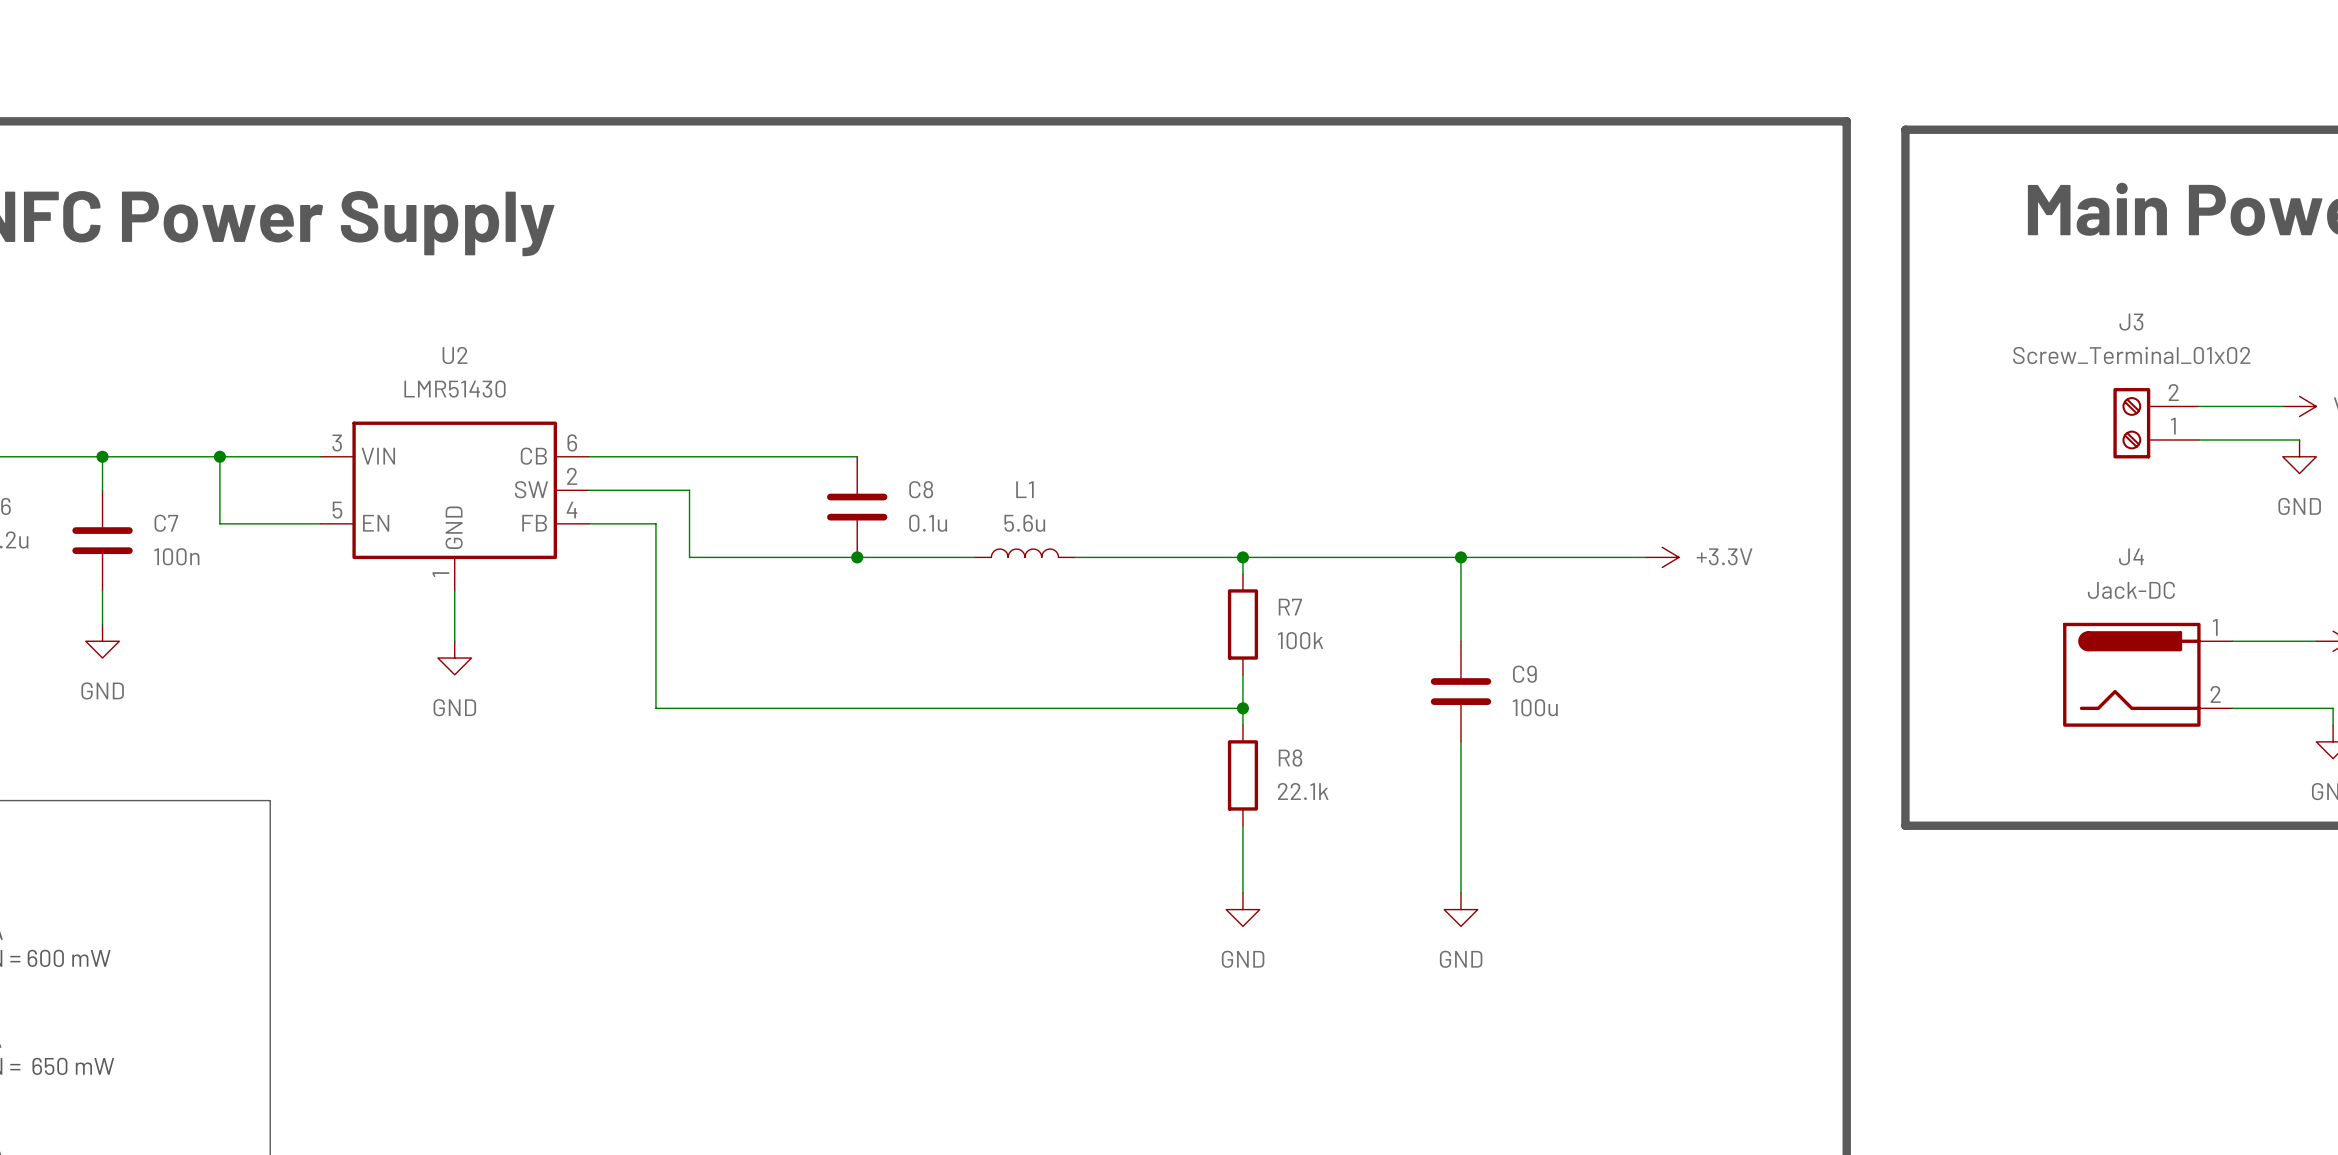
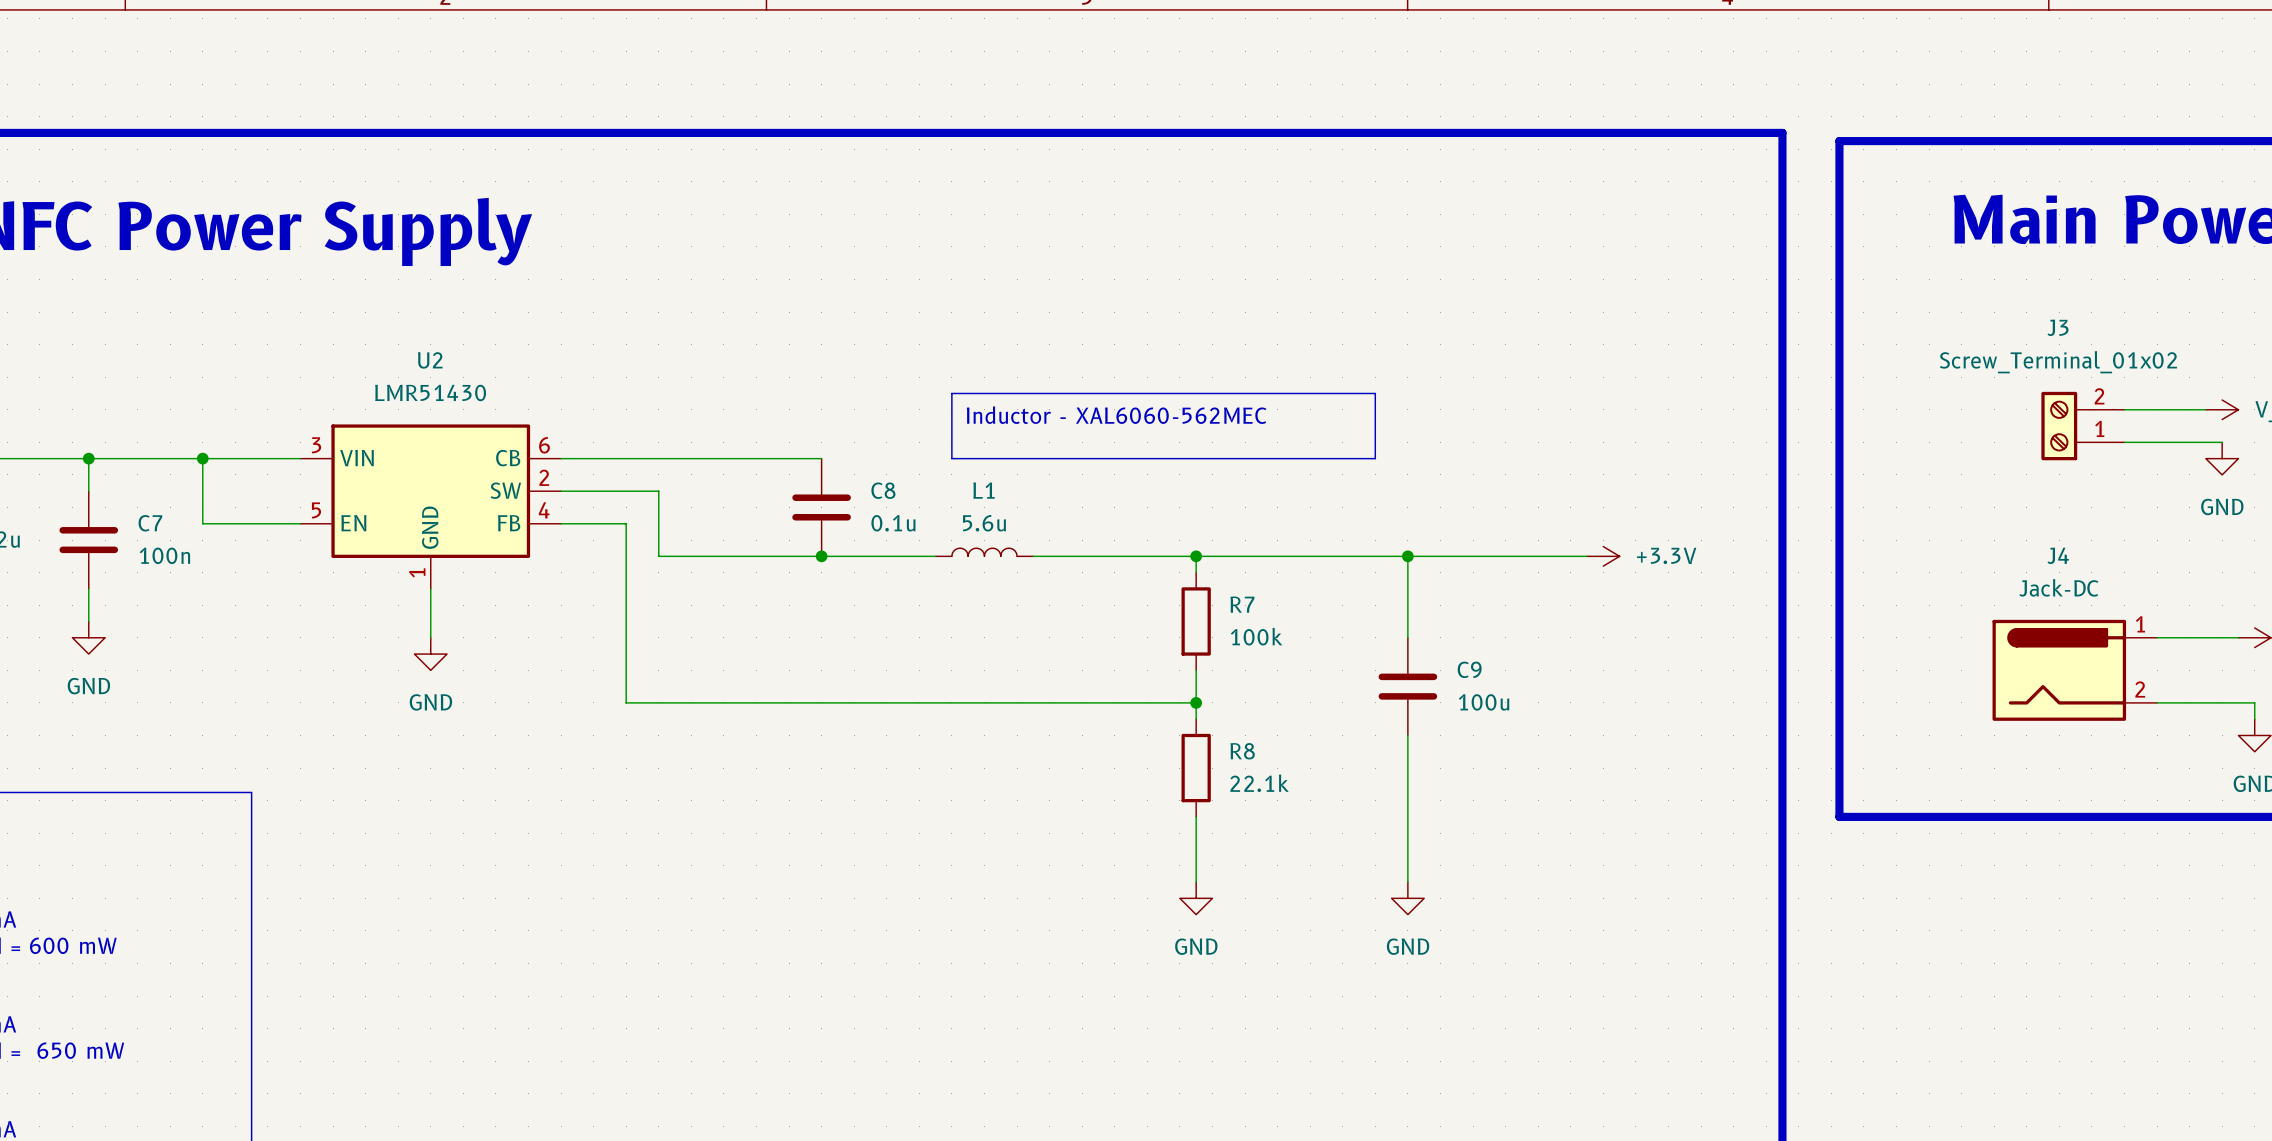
line: none -> (951, 393) (1375, 393) (1375, 458) (951, 458) (951, 393)
text: none -> Inductor - XAL6060-562MEC (1116, 415)

